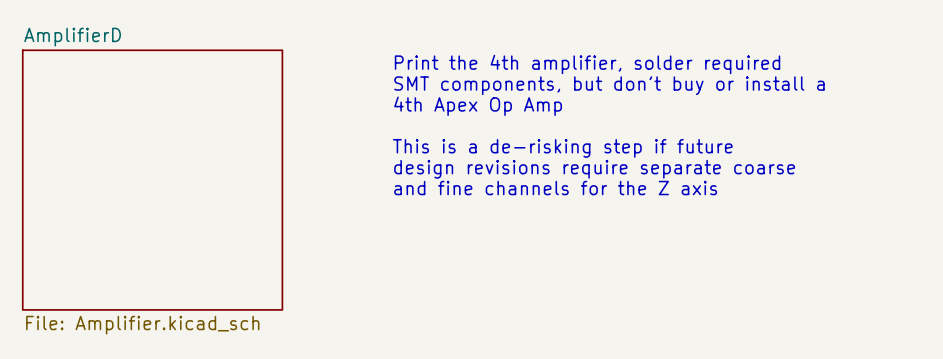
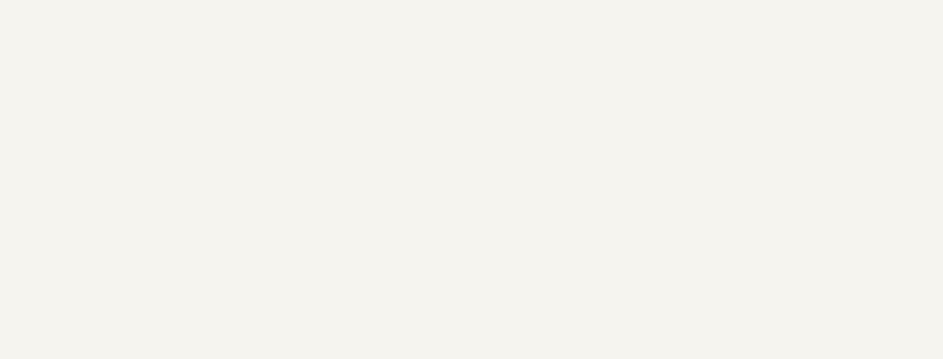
text: Print the 4th amplifier, solder required (587, 64) -> none
text: SMT components, but don't buy or install a (609, 85) -> none
text: 4th Apex Op Amp (478, 106) -> none
text: This is a de-risking step if future (562, 148) -> none
text: design revisions require separate coarse (594, 169) -> none
sheet AmplifierD: File: Amplifier.kicad_sch (152, 180) -> none
text: and fine channels for the Z axis (555, 188) -> none

